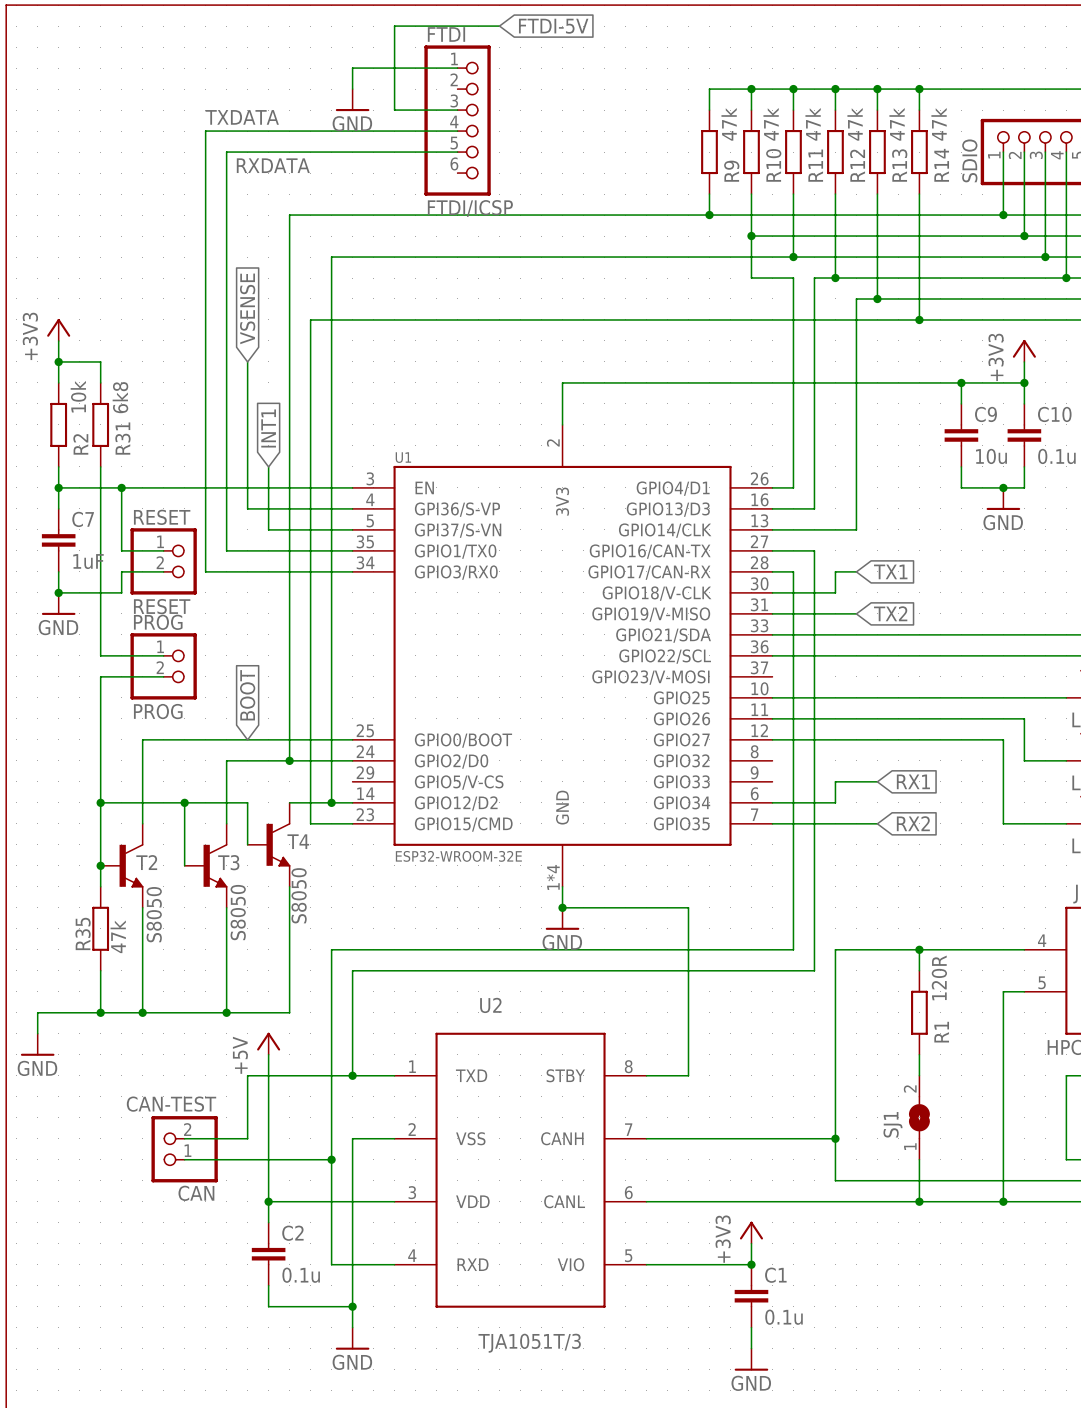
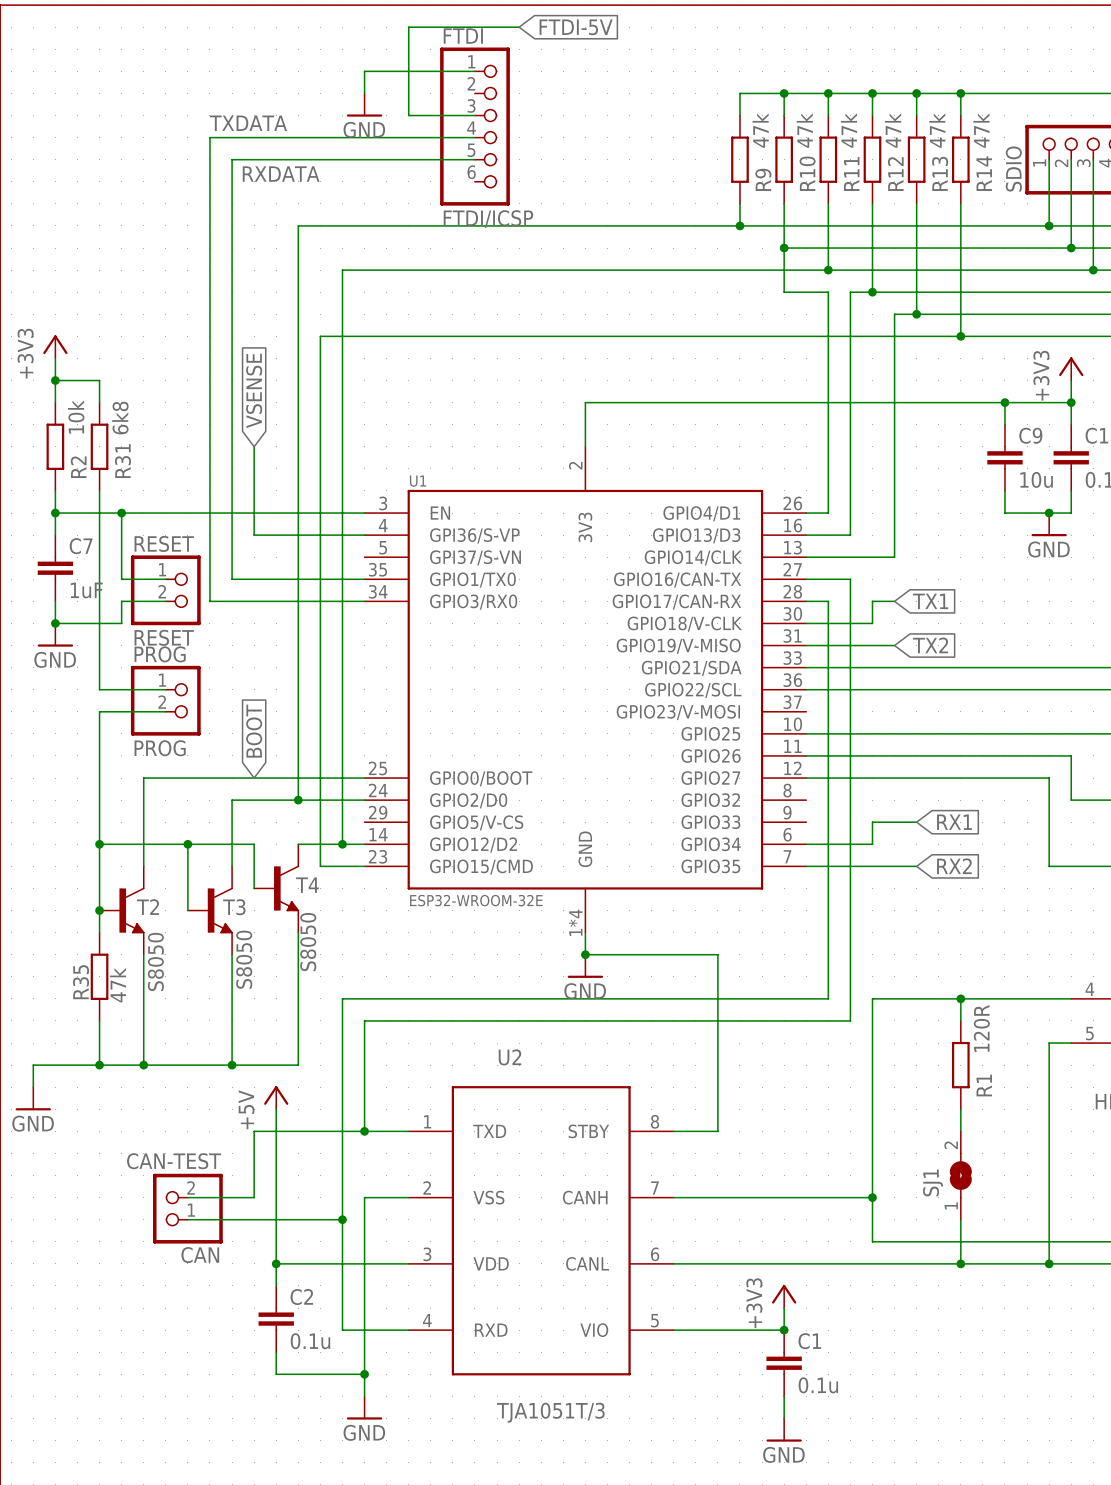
global label position: VSENSE (247, 308) -> VSENSE (254, 390)
wire: (247, 361) (247, 424) -> none
global label: INT1 (268, 428) -> none
wire: (268, 466) (268, 529) (352, 529) -> none

